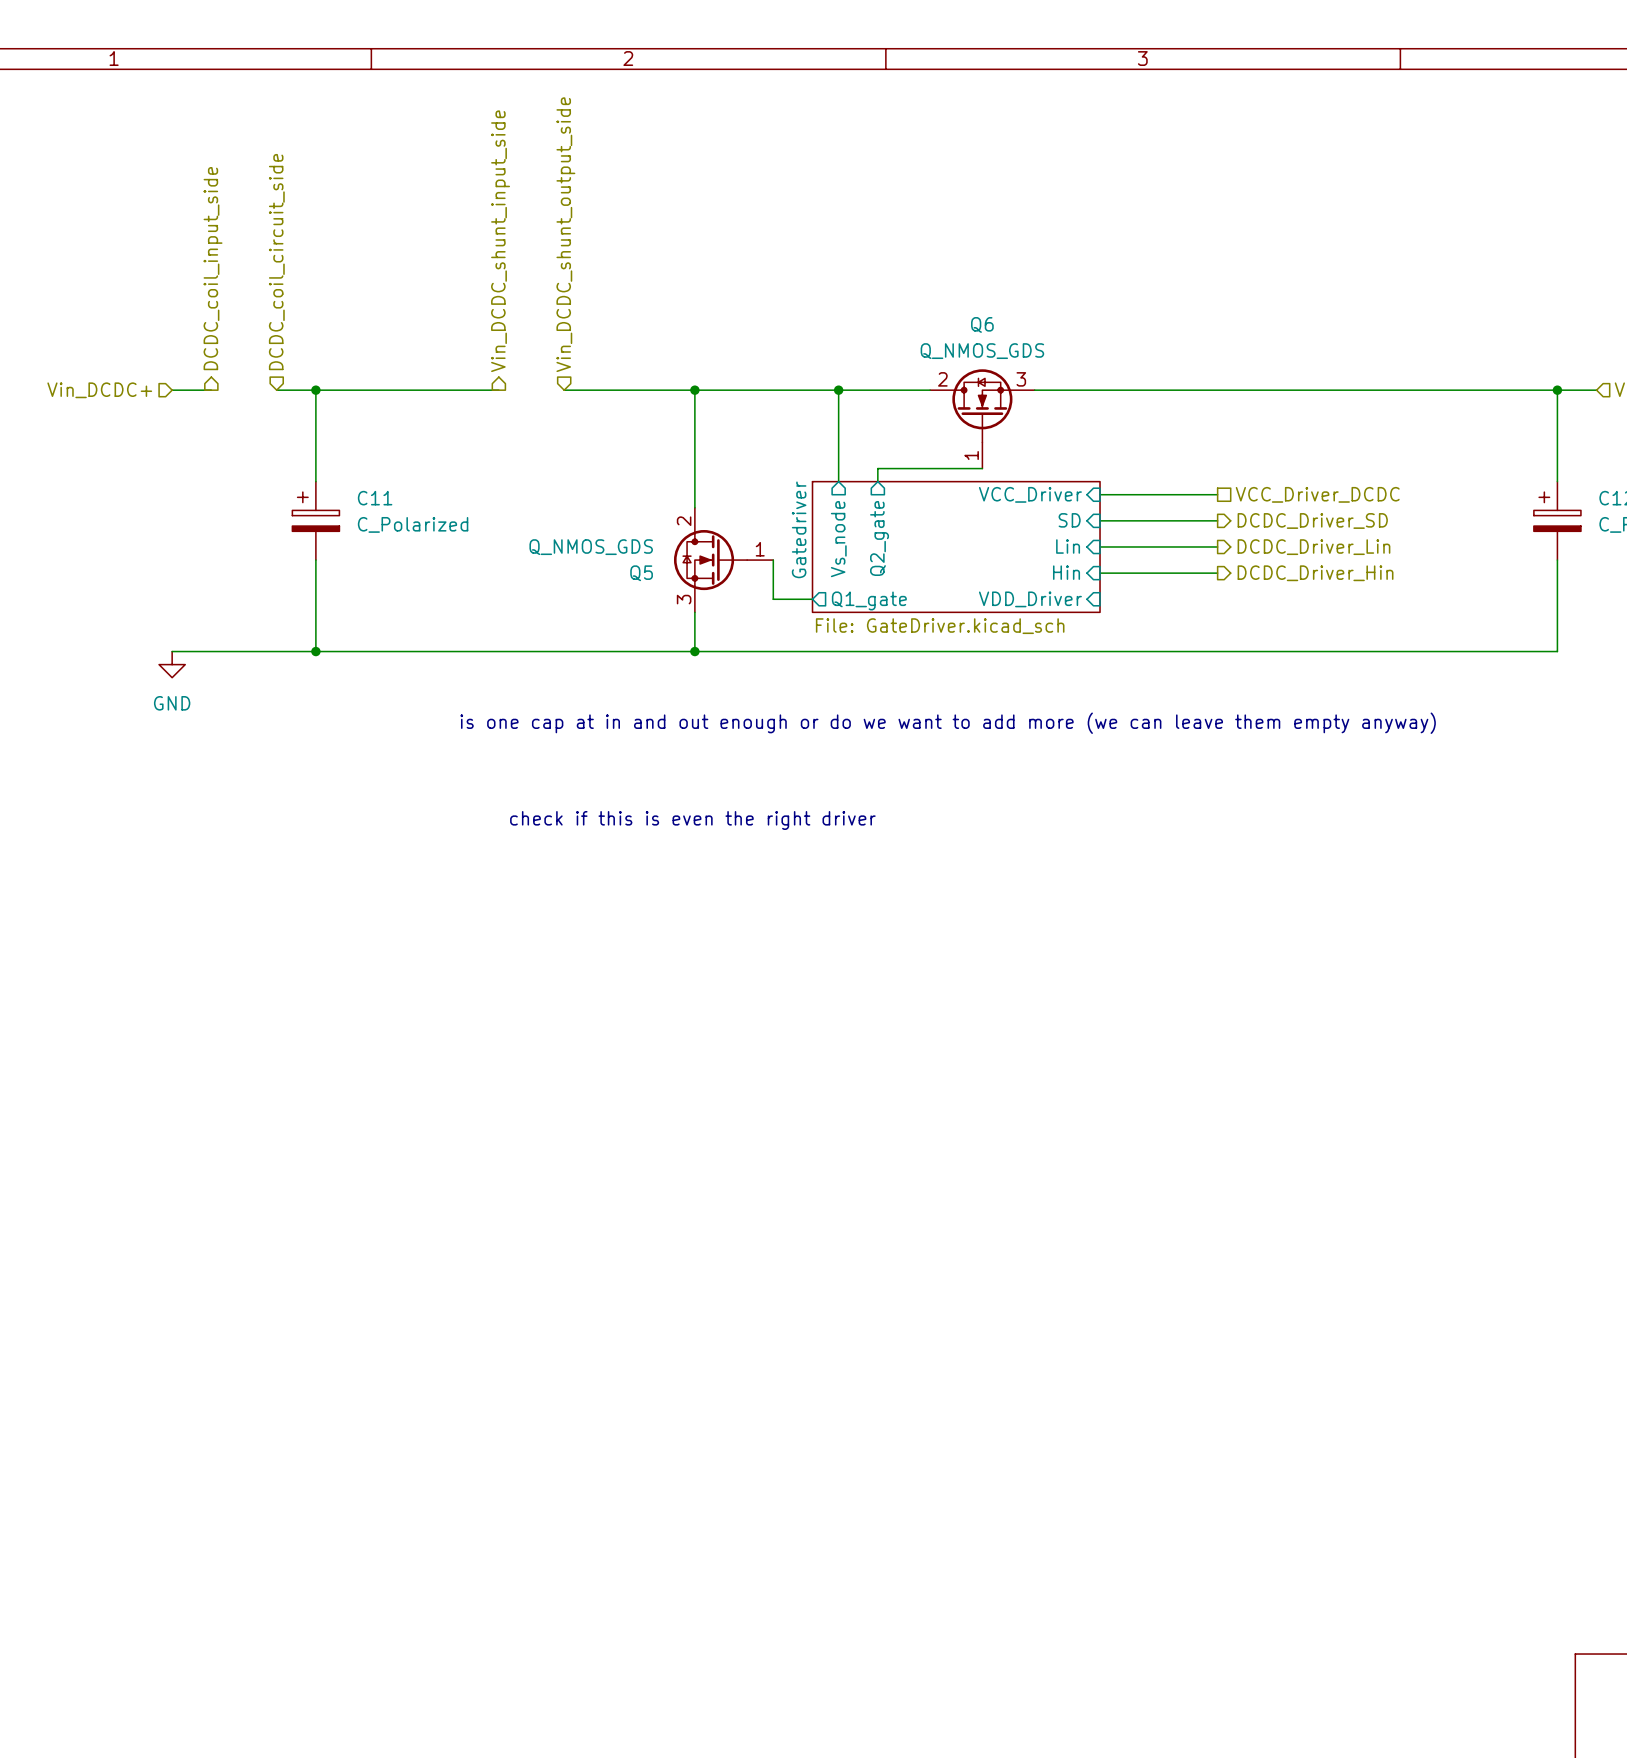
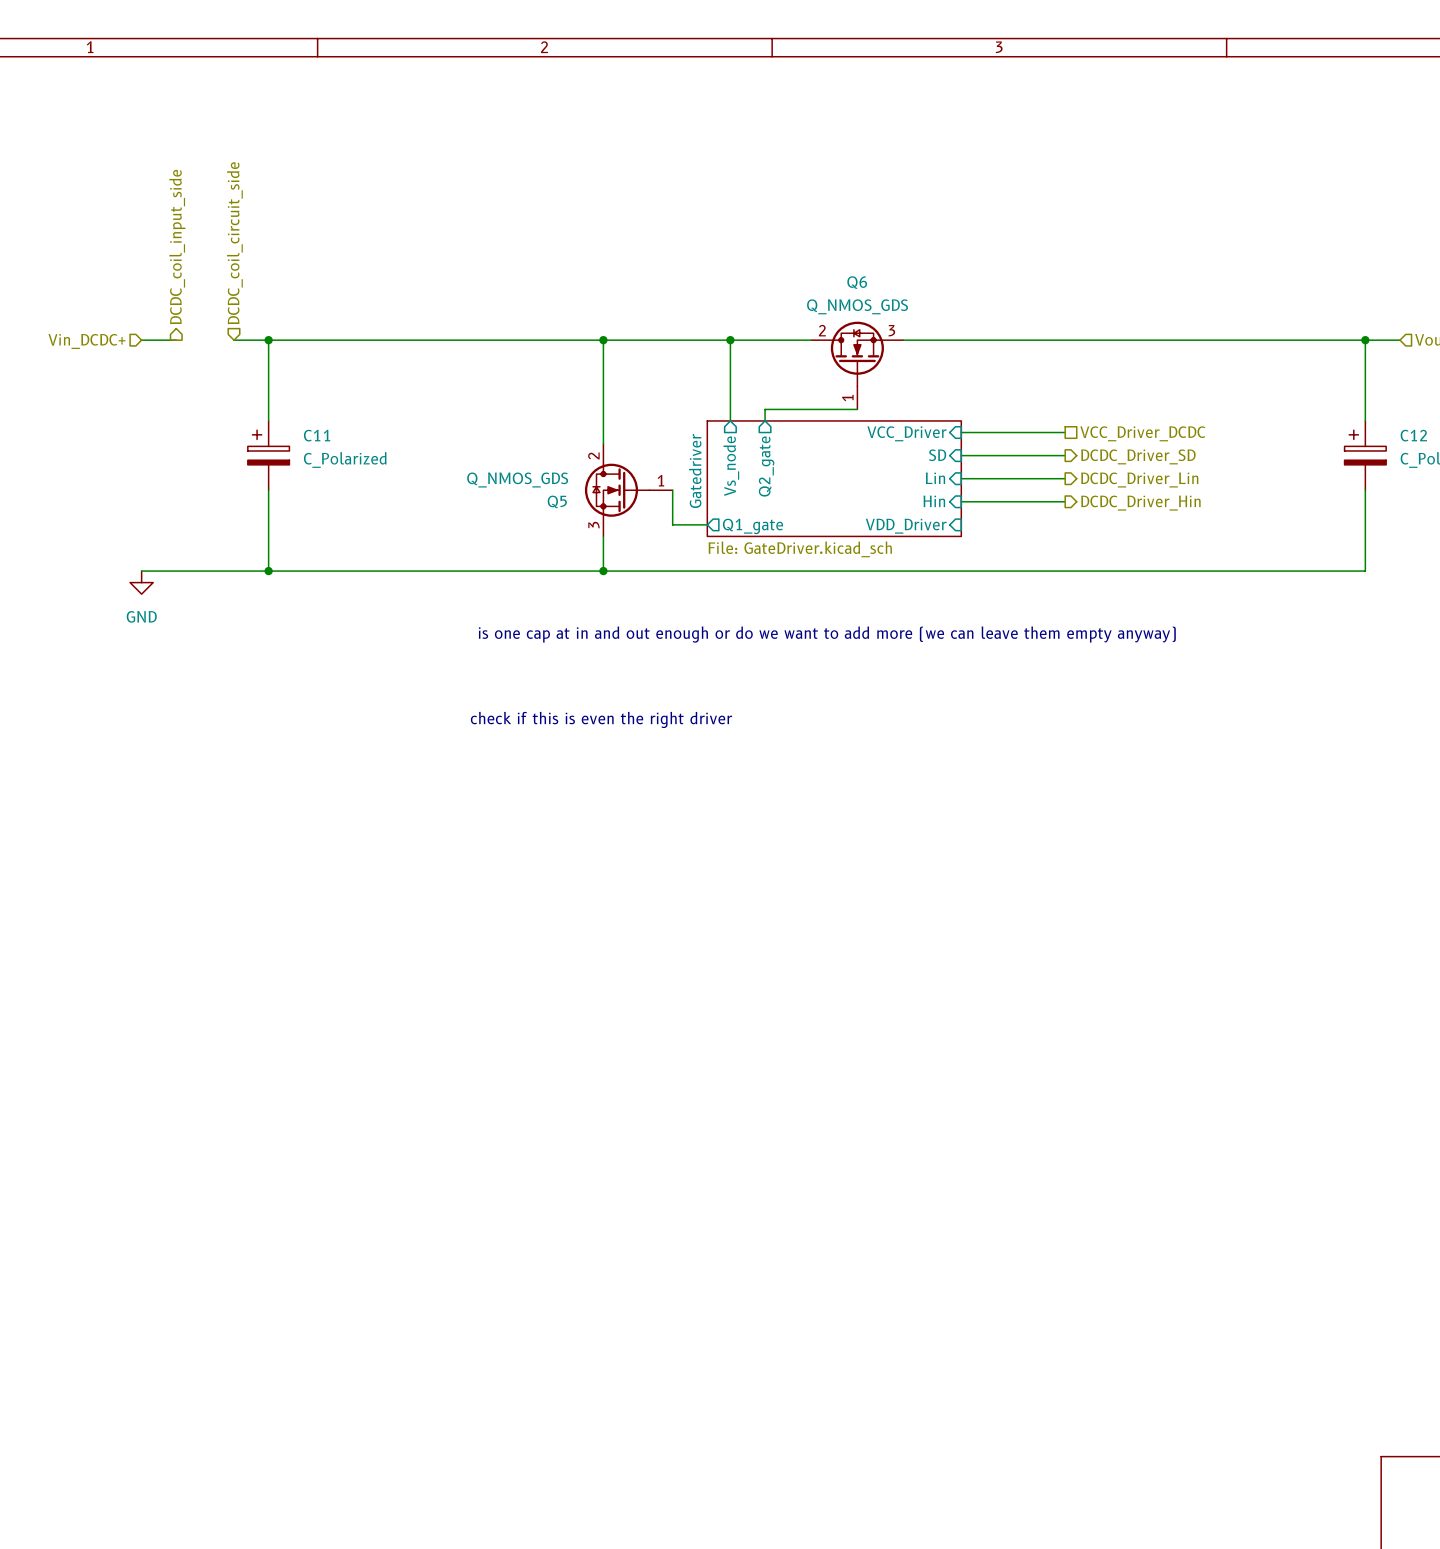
hierarchical label: Vin_DCDC_shunt_output_side (565, 234) -> none
hierarchical label: Vin_DCDC_shunt_input_side (500, 241) -> none
wire: none -> (430, 340) (487, 340)

